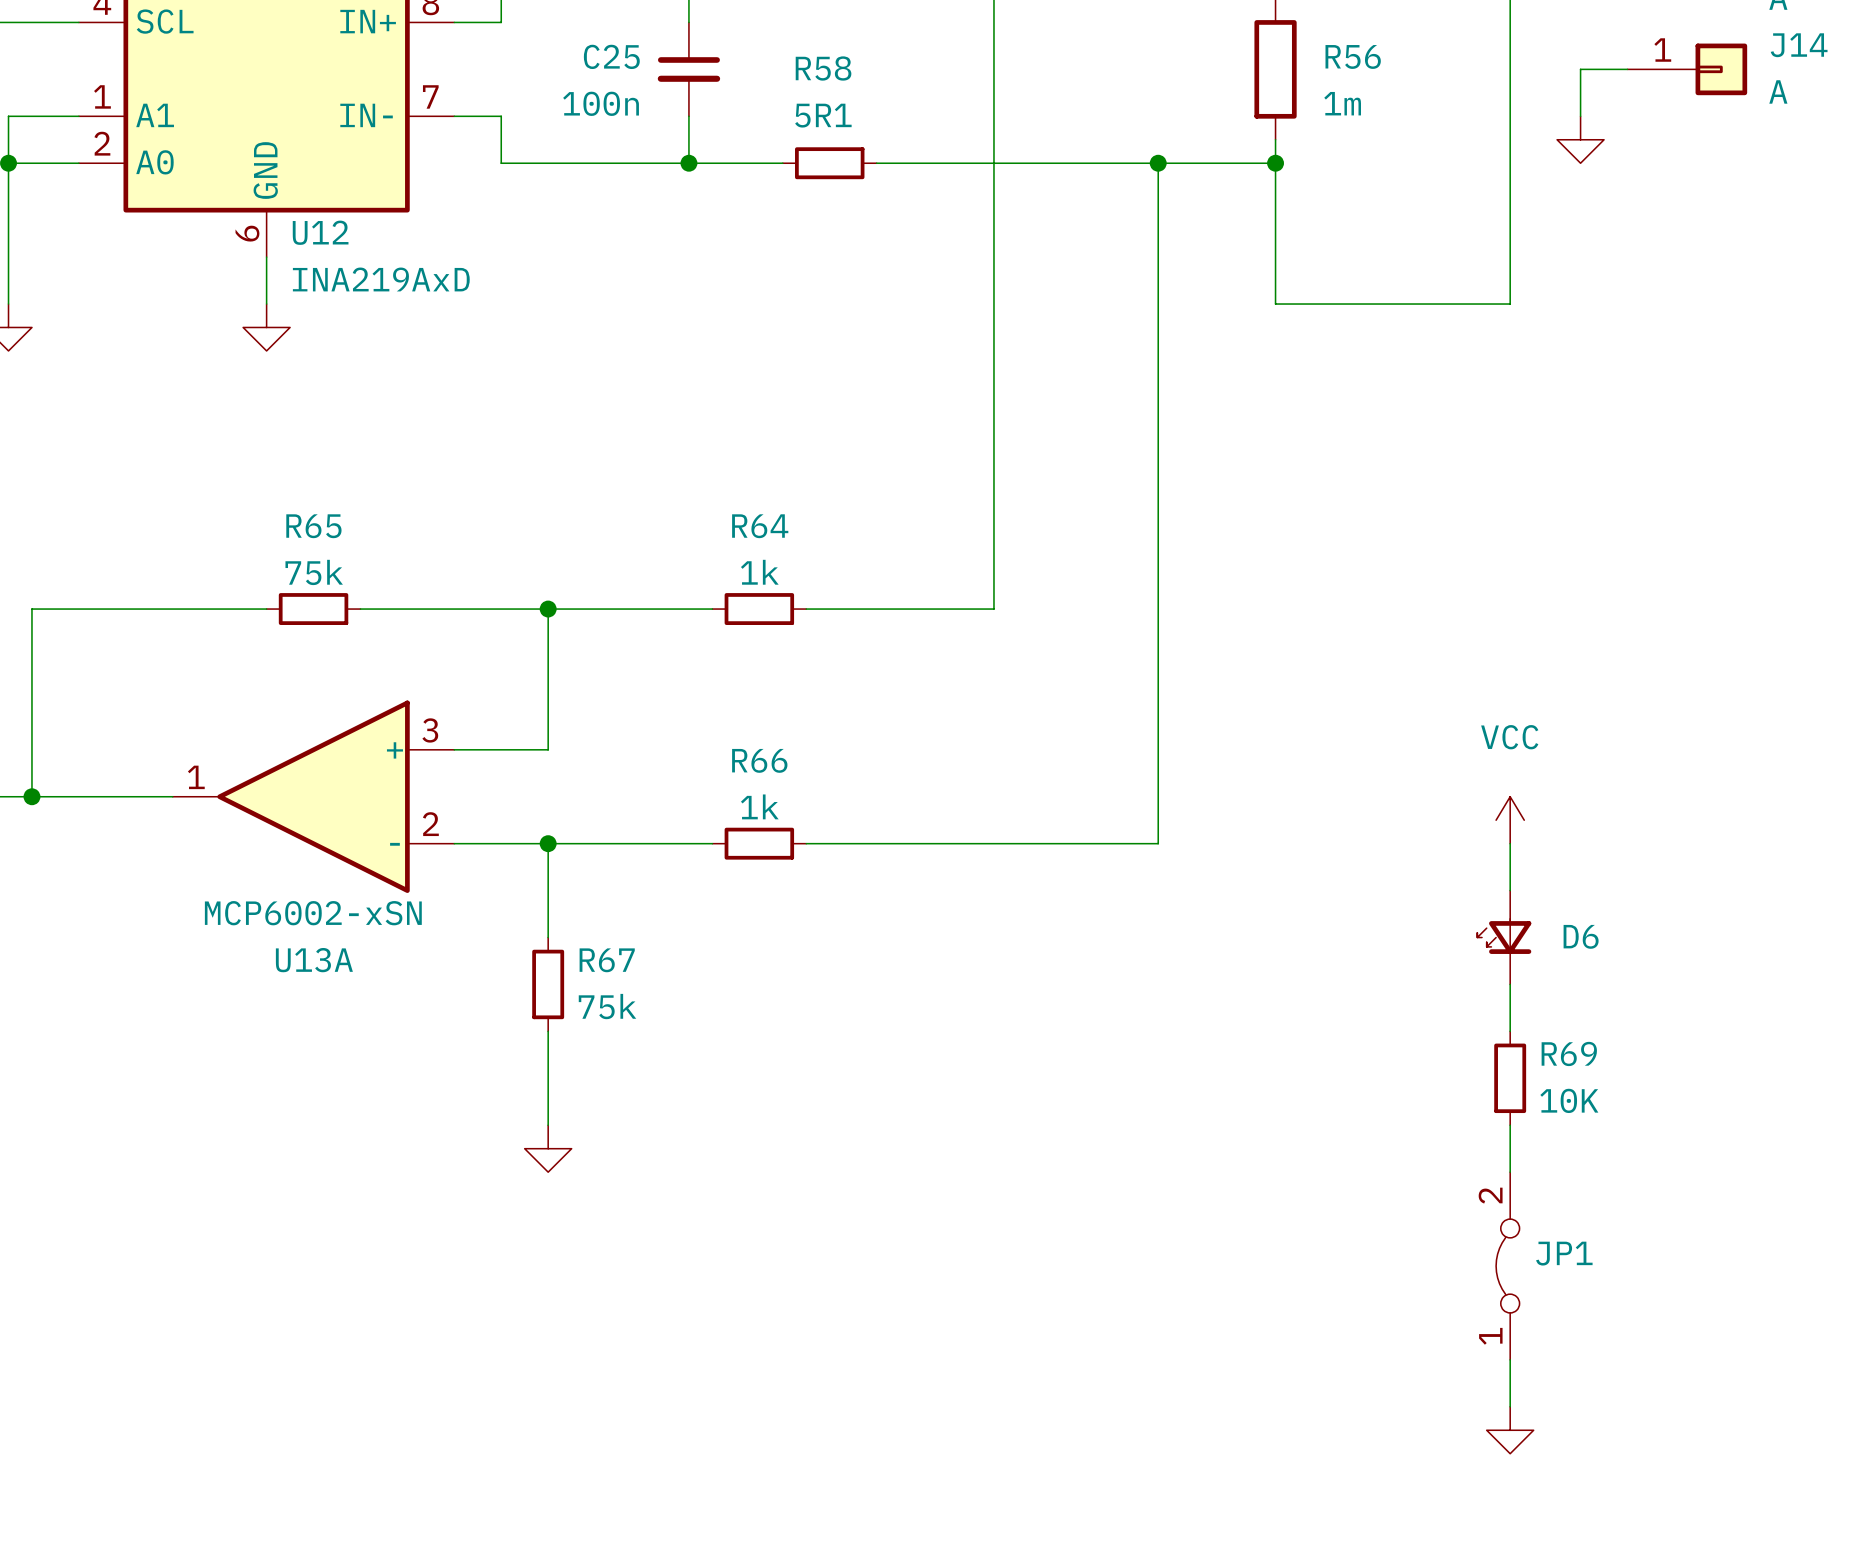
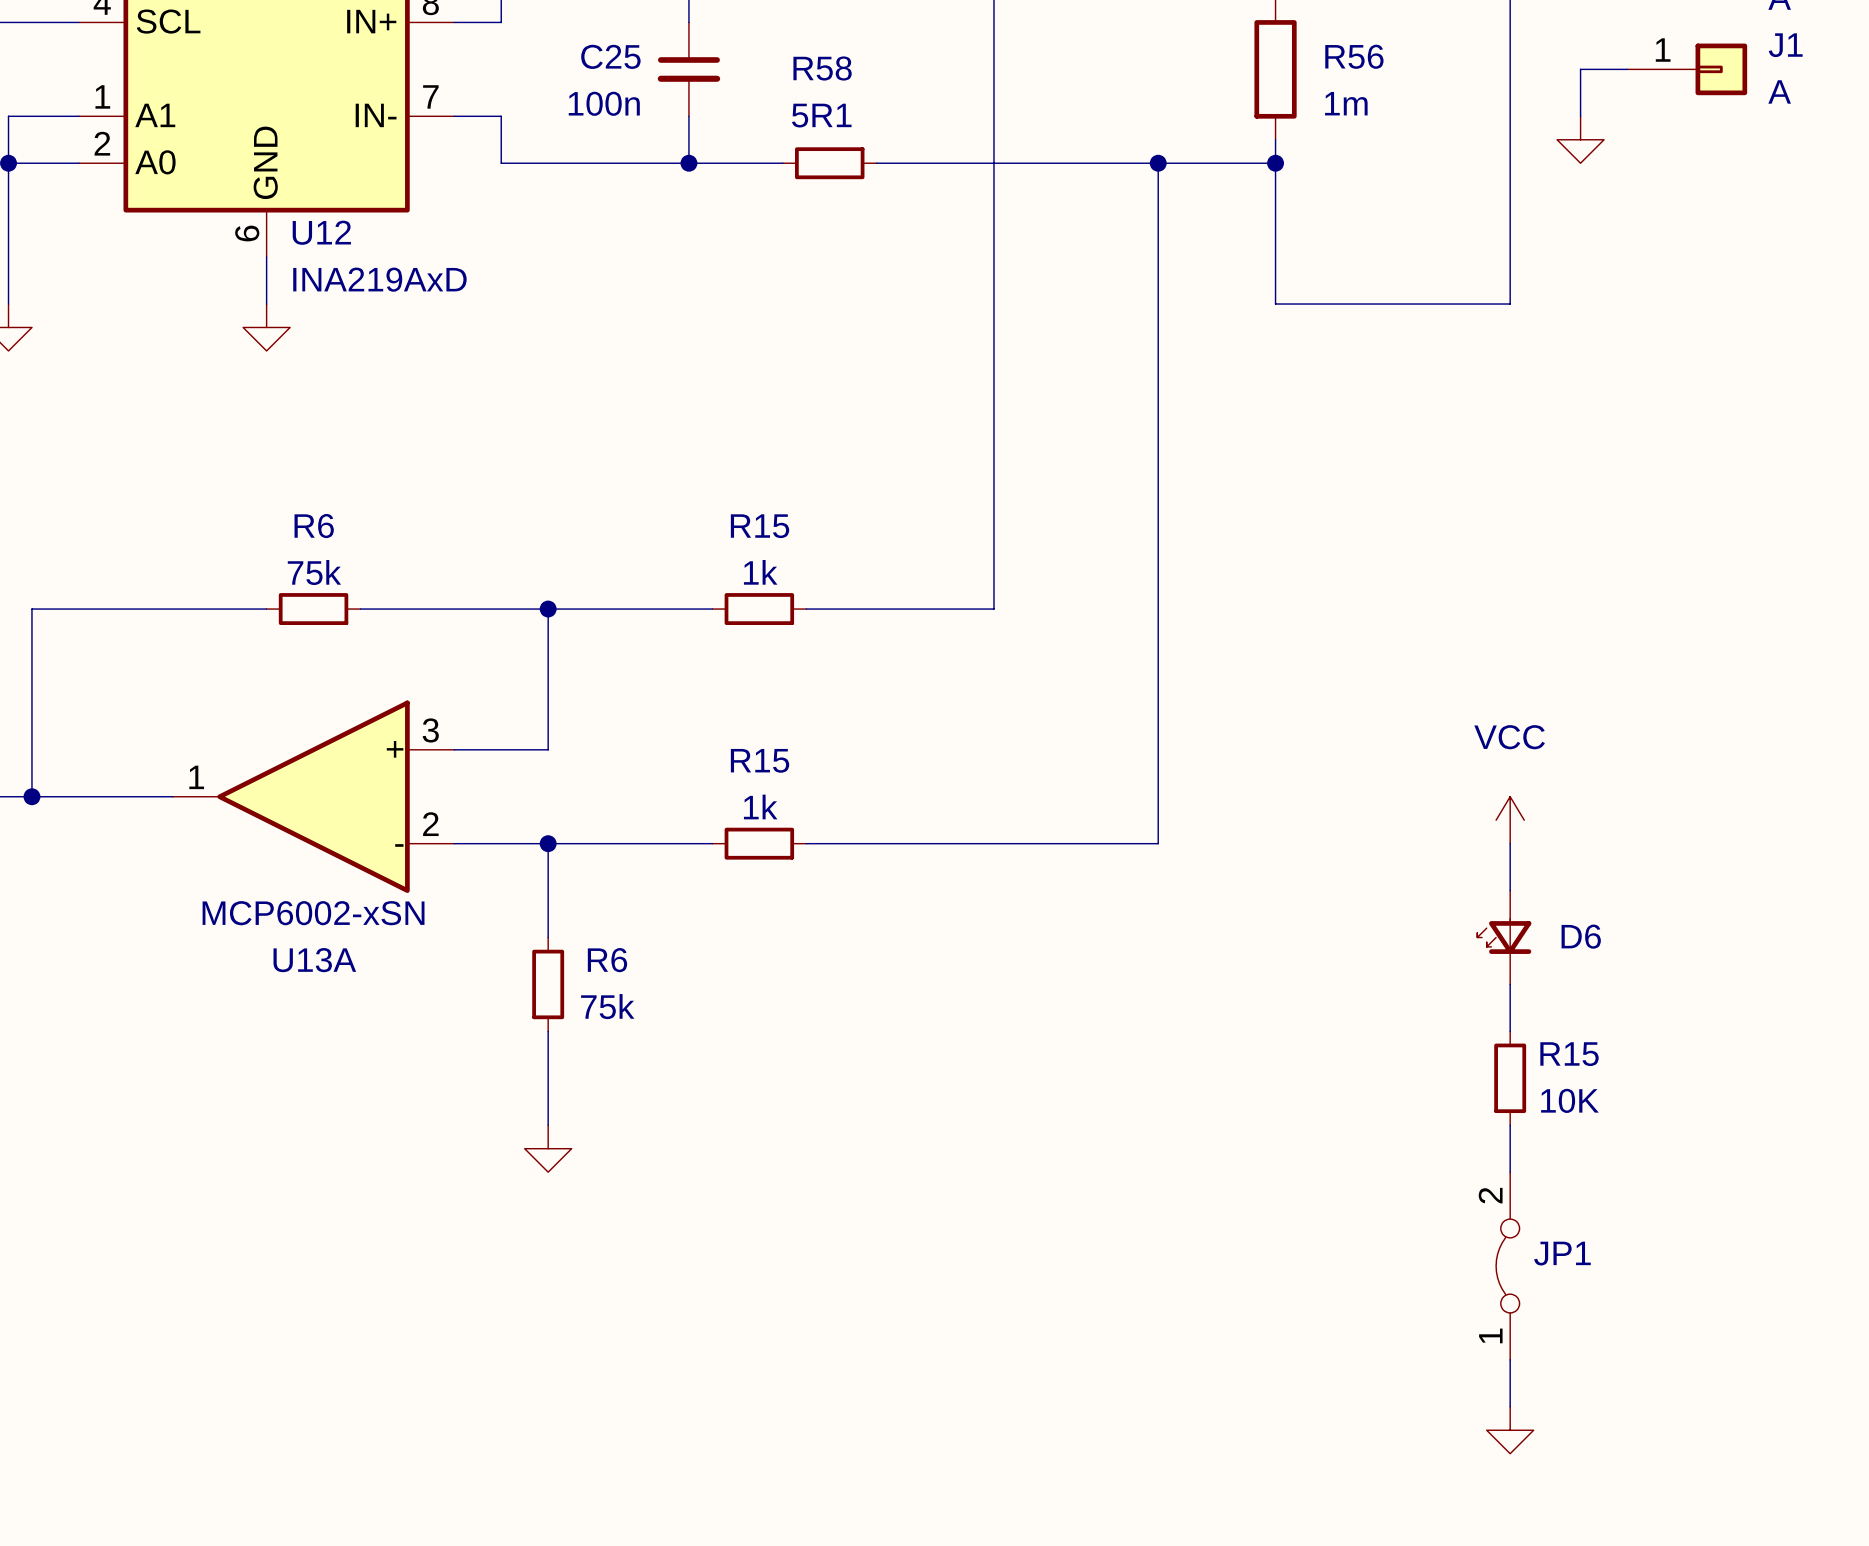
J14 name: J14 (1799, 45) -> J1 (1785, 45)
R65 name: R65 (313, 526) -> R6 (314, 526)
R64 name: R64 (760, 526) -> R15 (760, 526)
R66 name: R66 (759, 760) -> R15 (760, 760)
R67 name: R67 (607, 960) -> R6 (607, 960)
R69 name: R69 (1569, 1053) -> R15 (1569, 1054)

